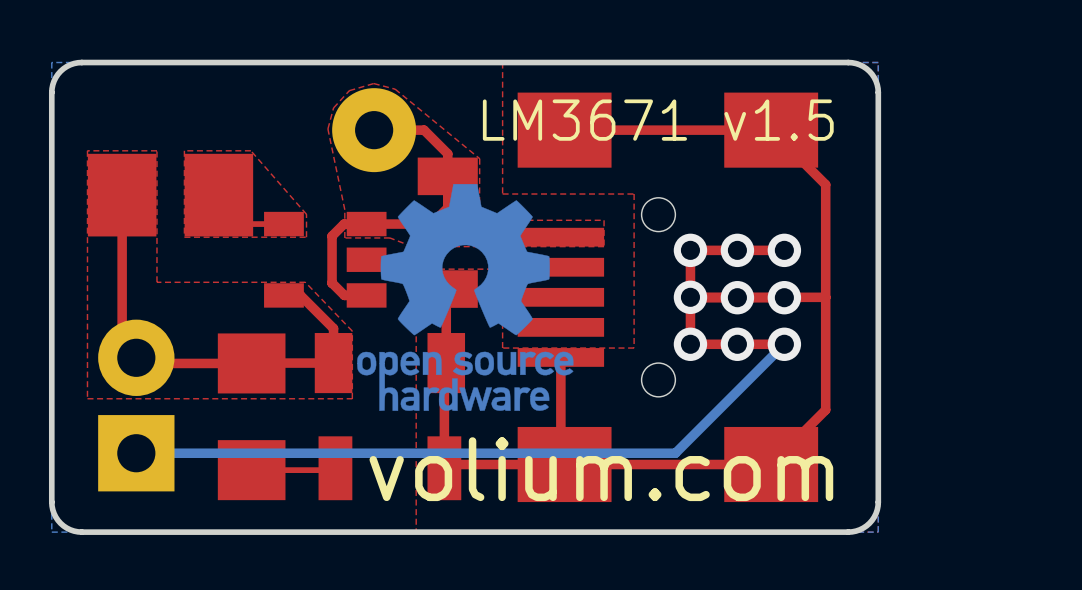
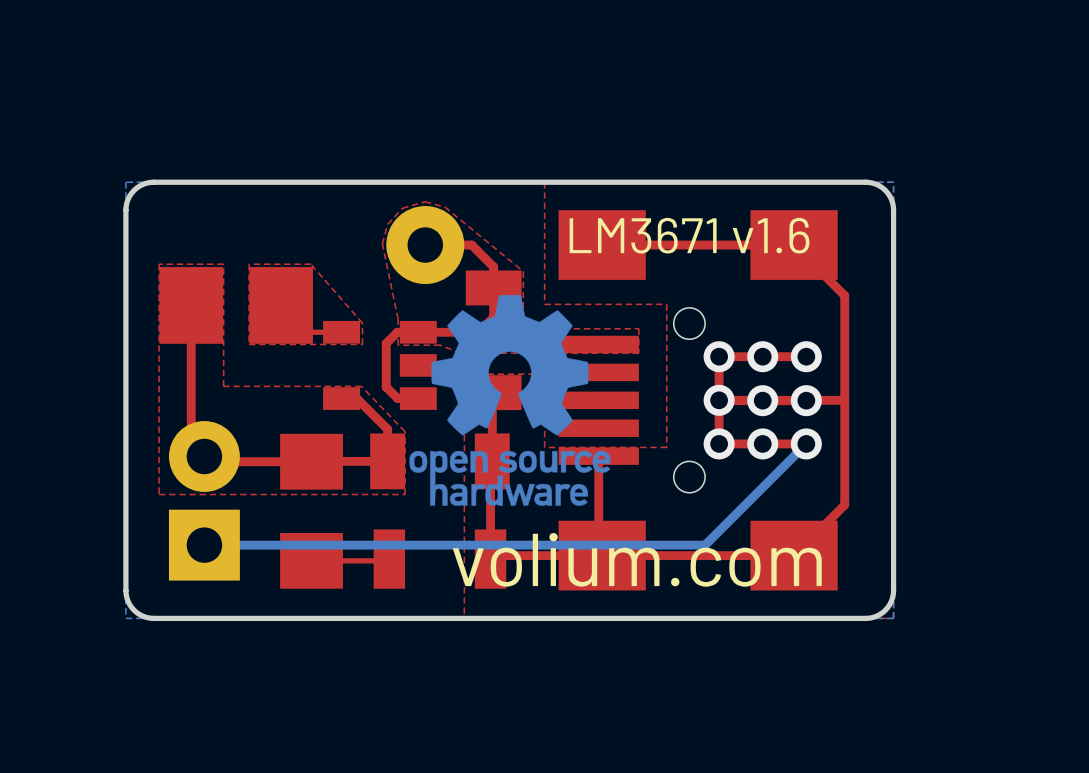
text: LM3671 v1.5 (658, 120) -> LM3671 v1.6 (689, 235)

